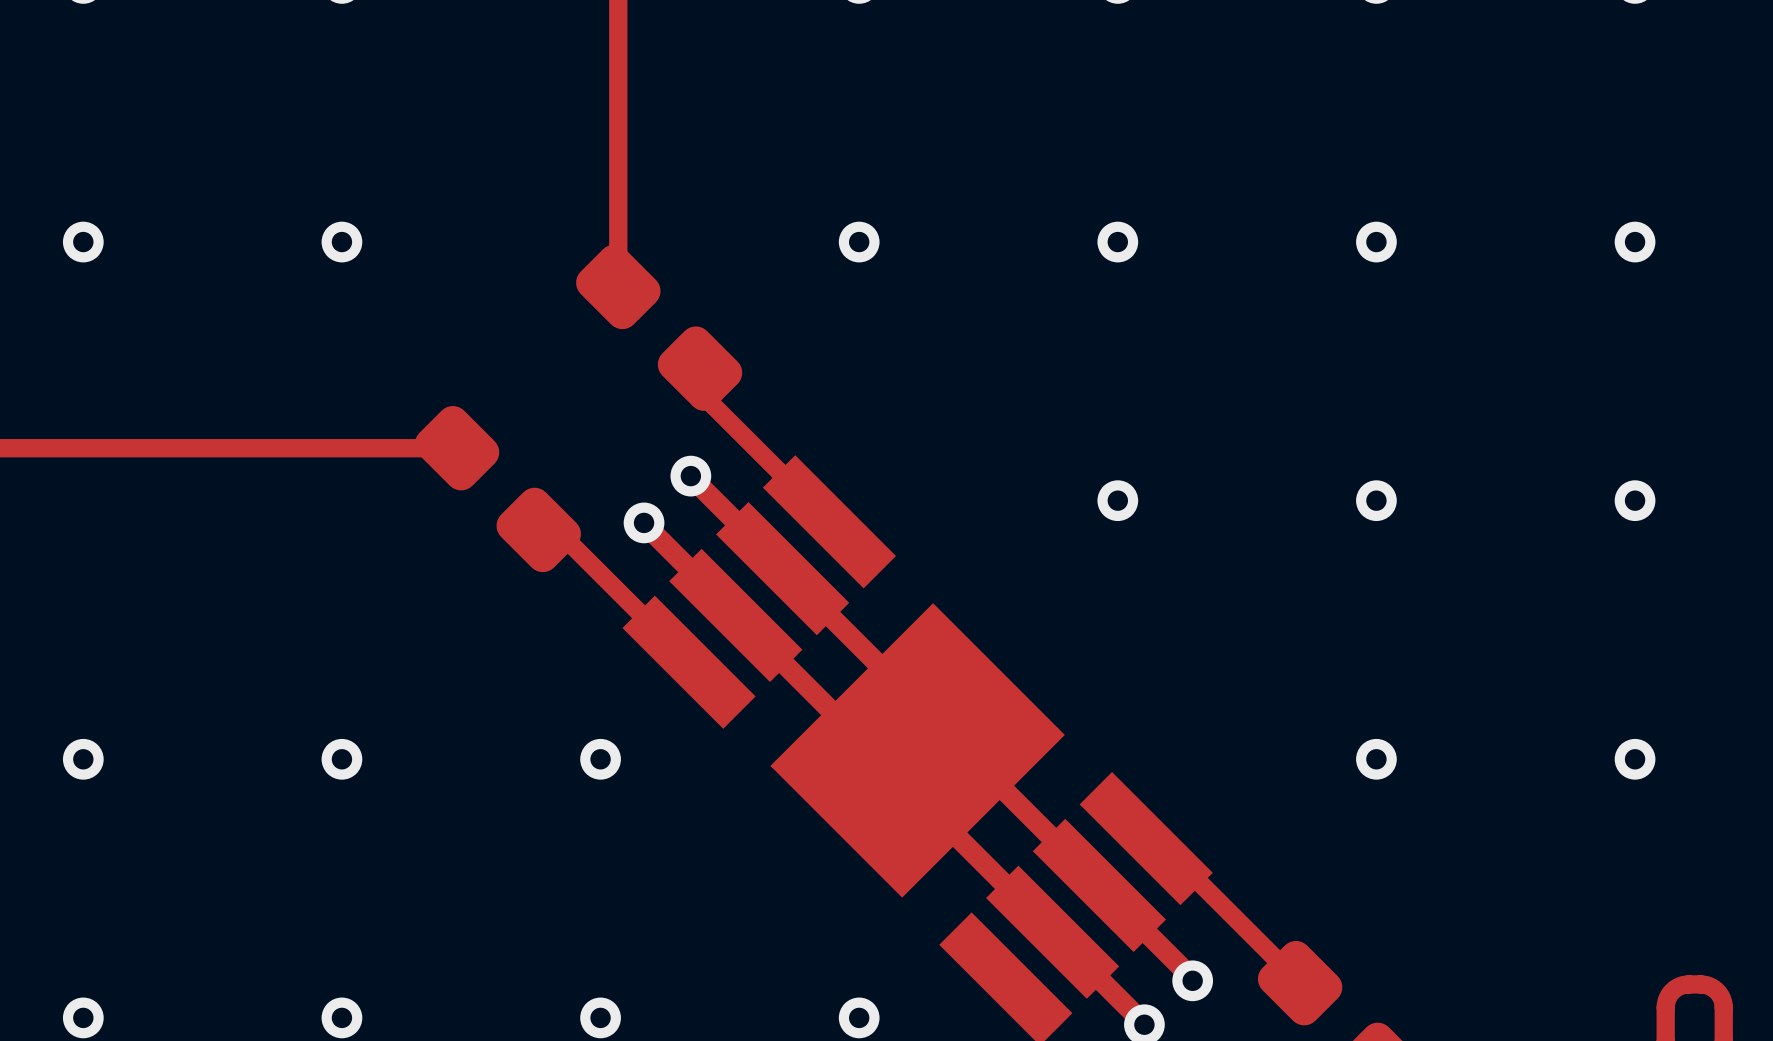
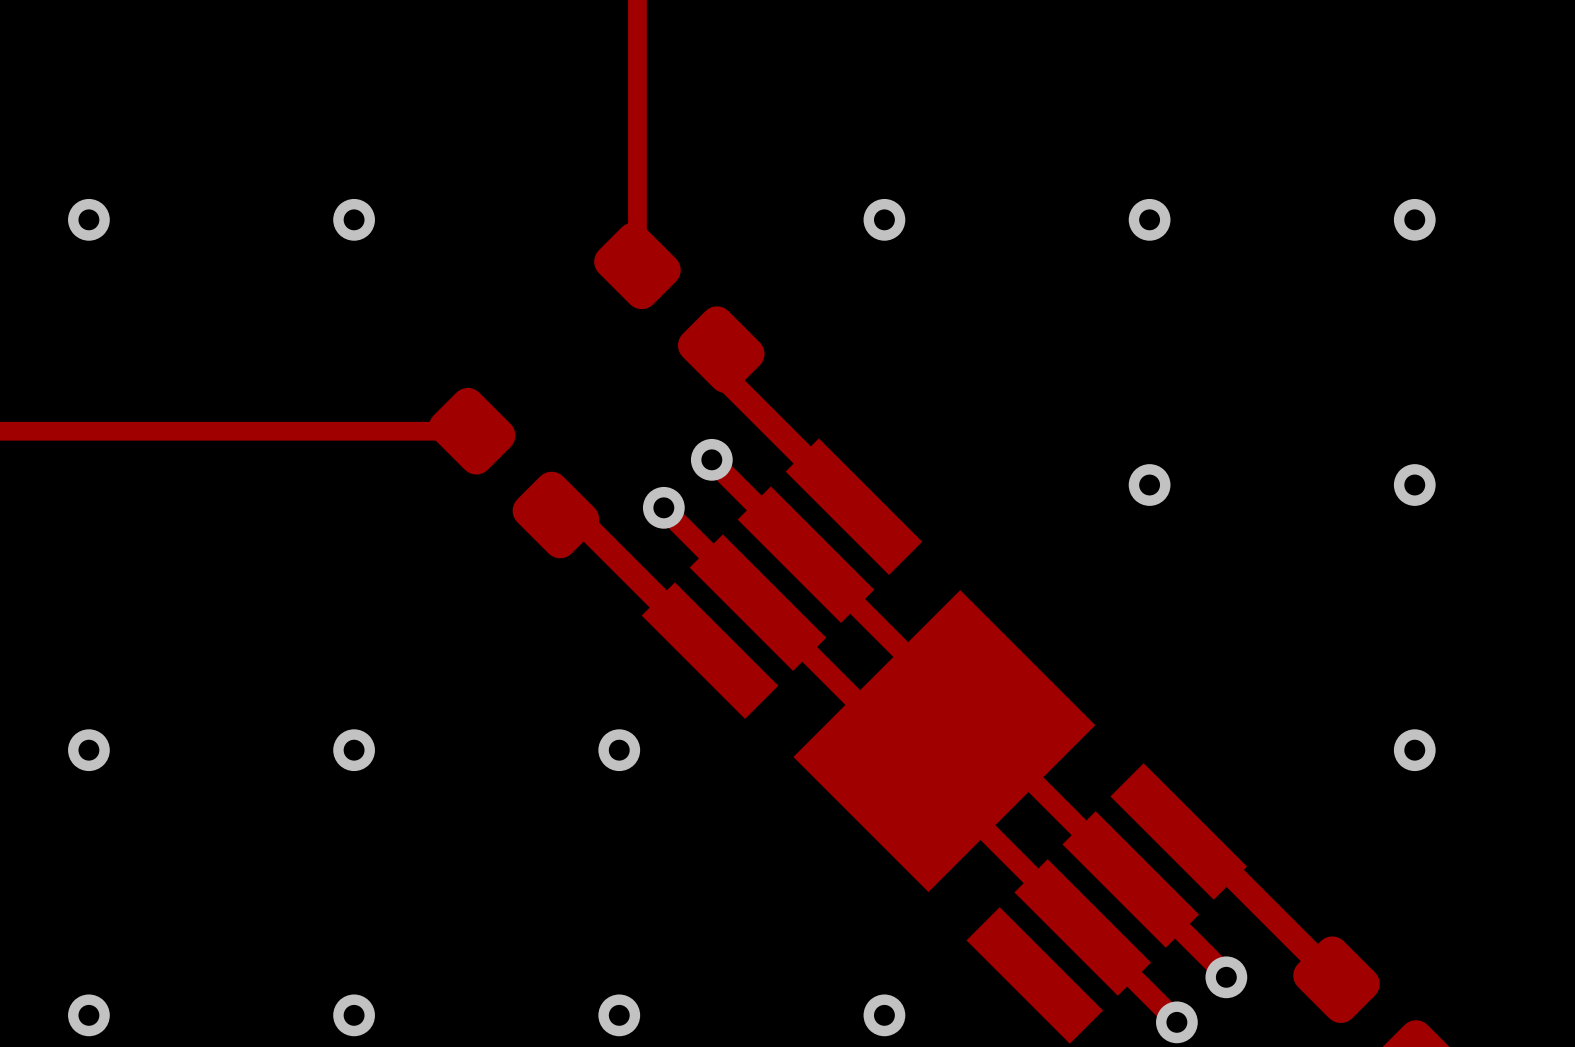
top track width: thin (700, 368) (700, 392) (829, 521) -> thick (721, 349) (721, 374) (853, 506)
top track width: thin (538, 529) (556, 529) (689, 662) -> thick (555, 515) (574, 515) (709, 650)
top track width: thin (1146, 838) (1155, 838) (1300, 983) -> thick (1178, 831) (1188, 831) (1336, 979)

